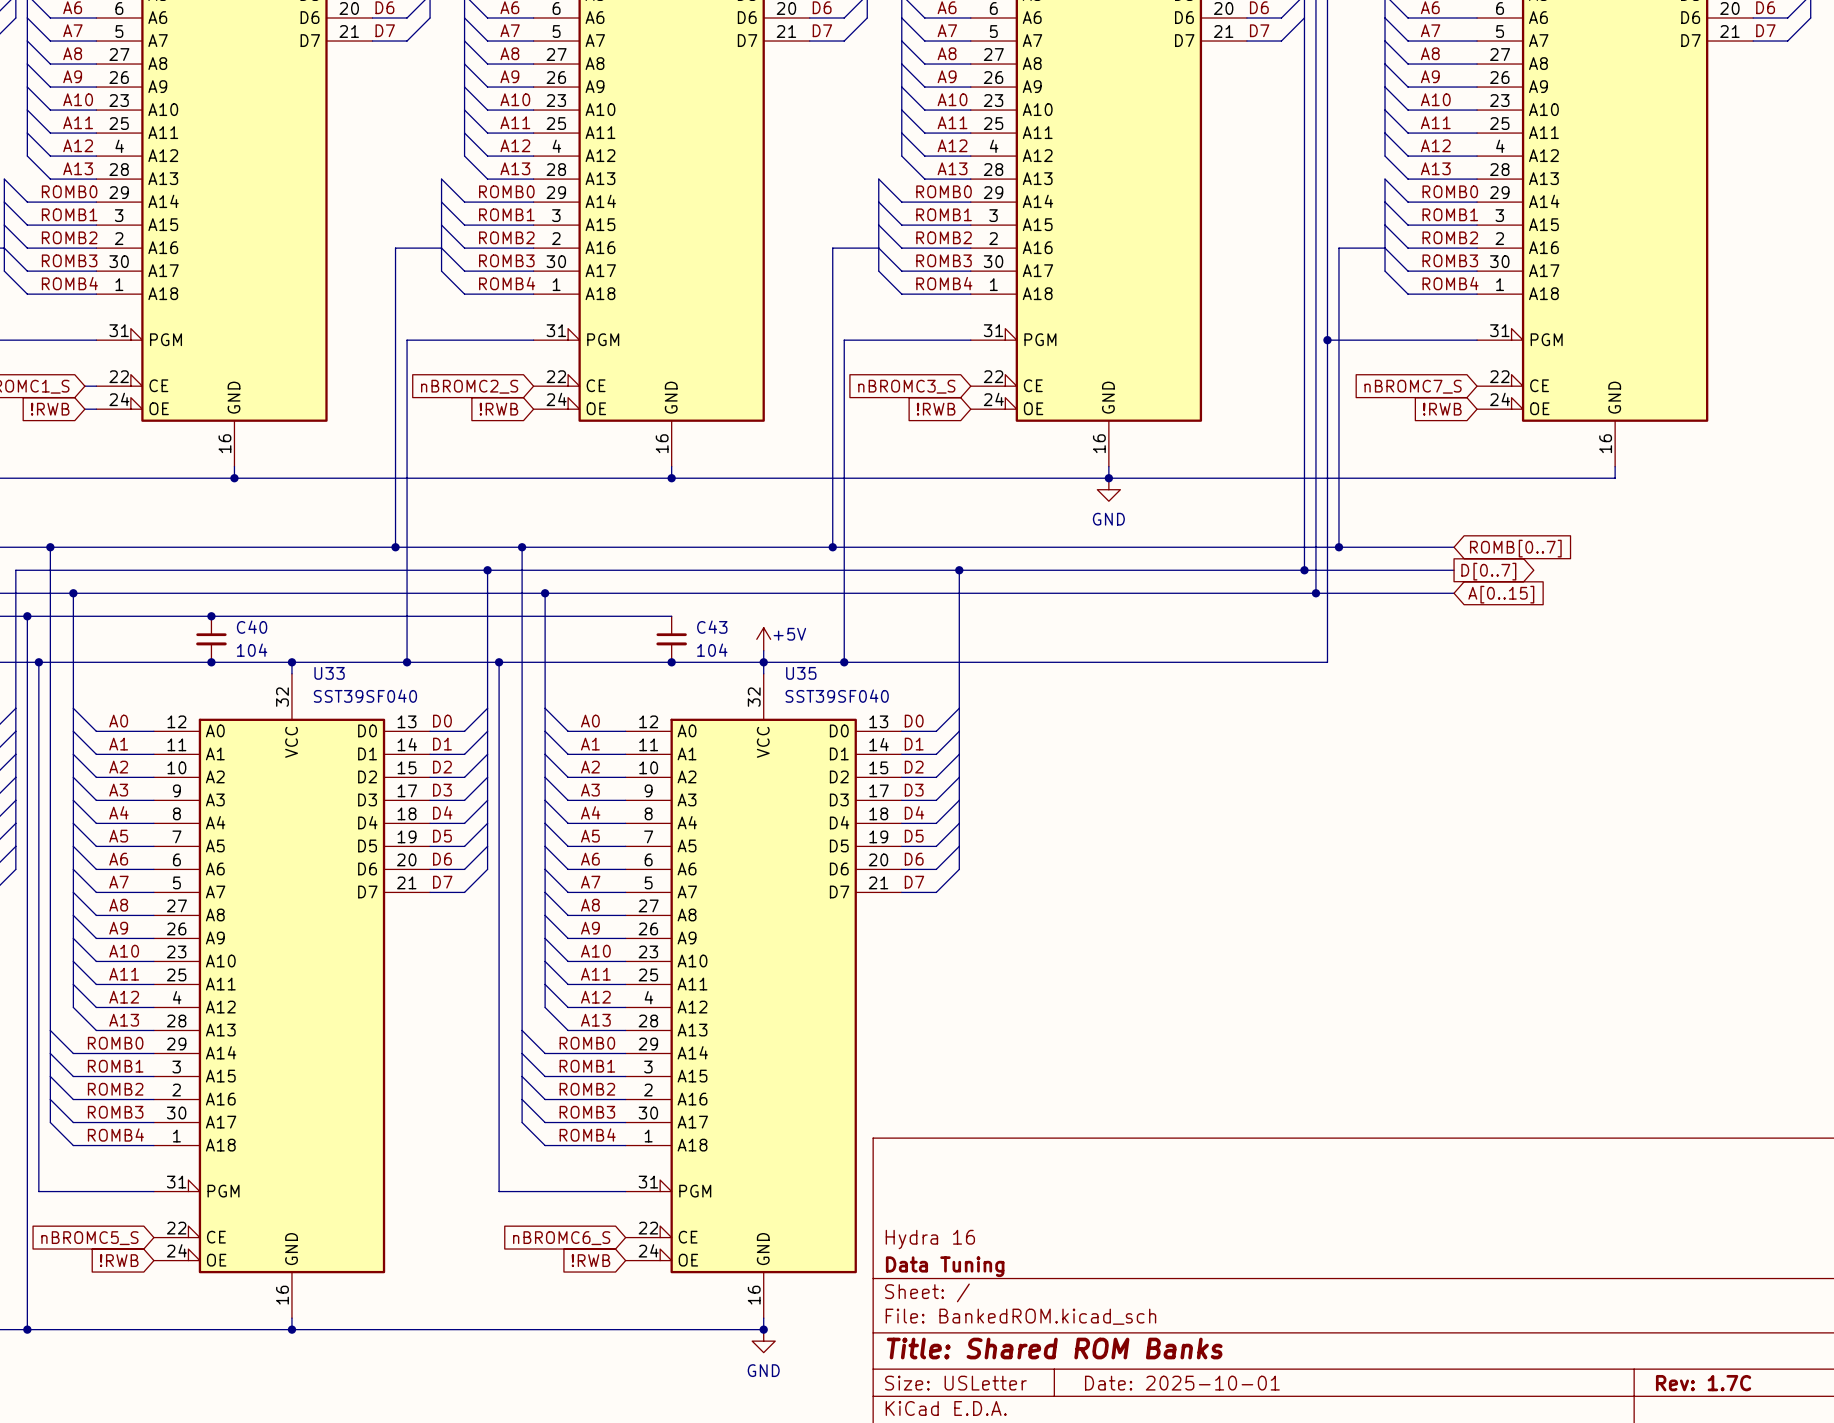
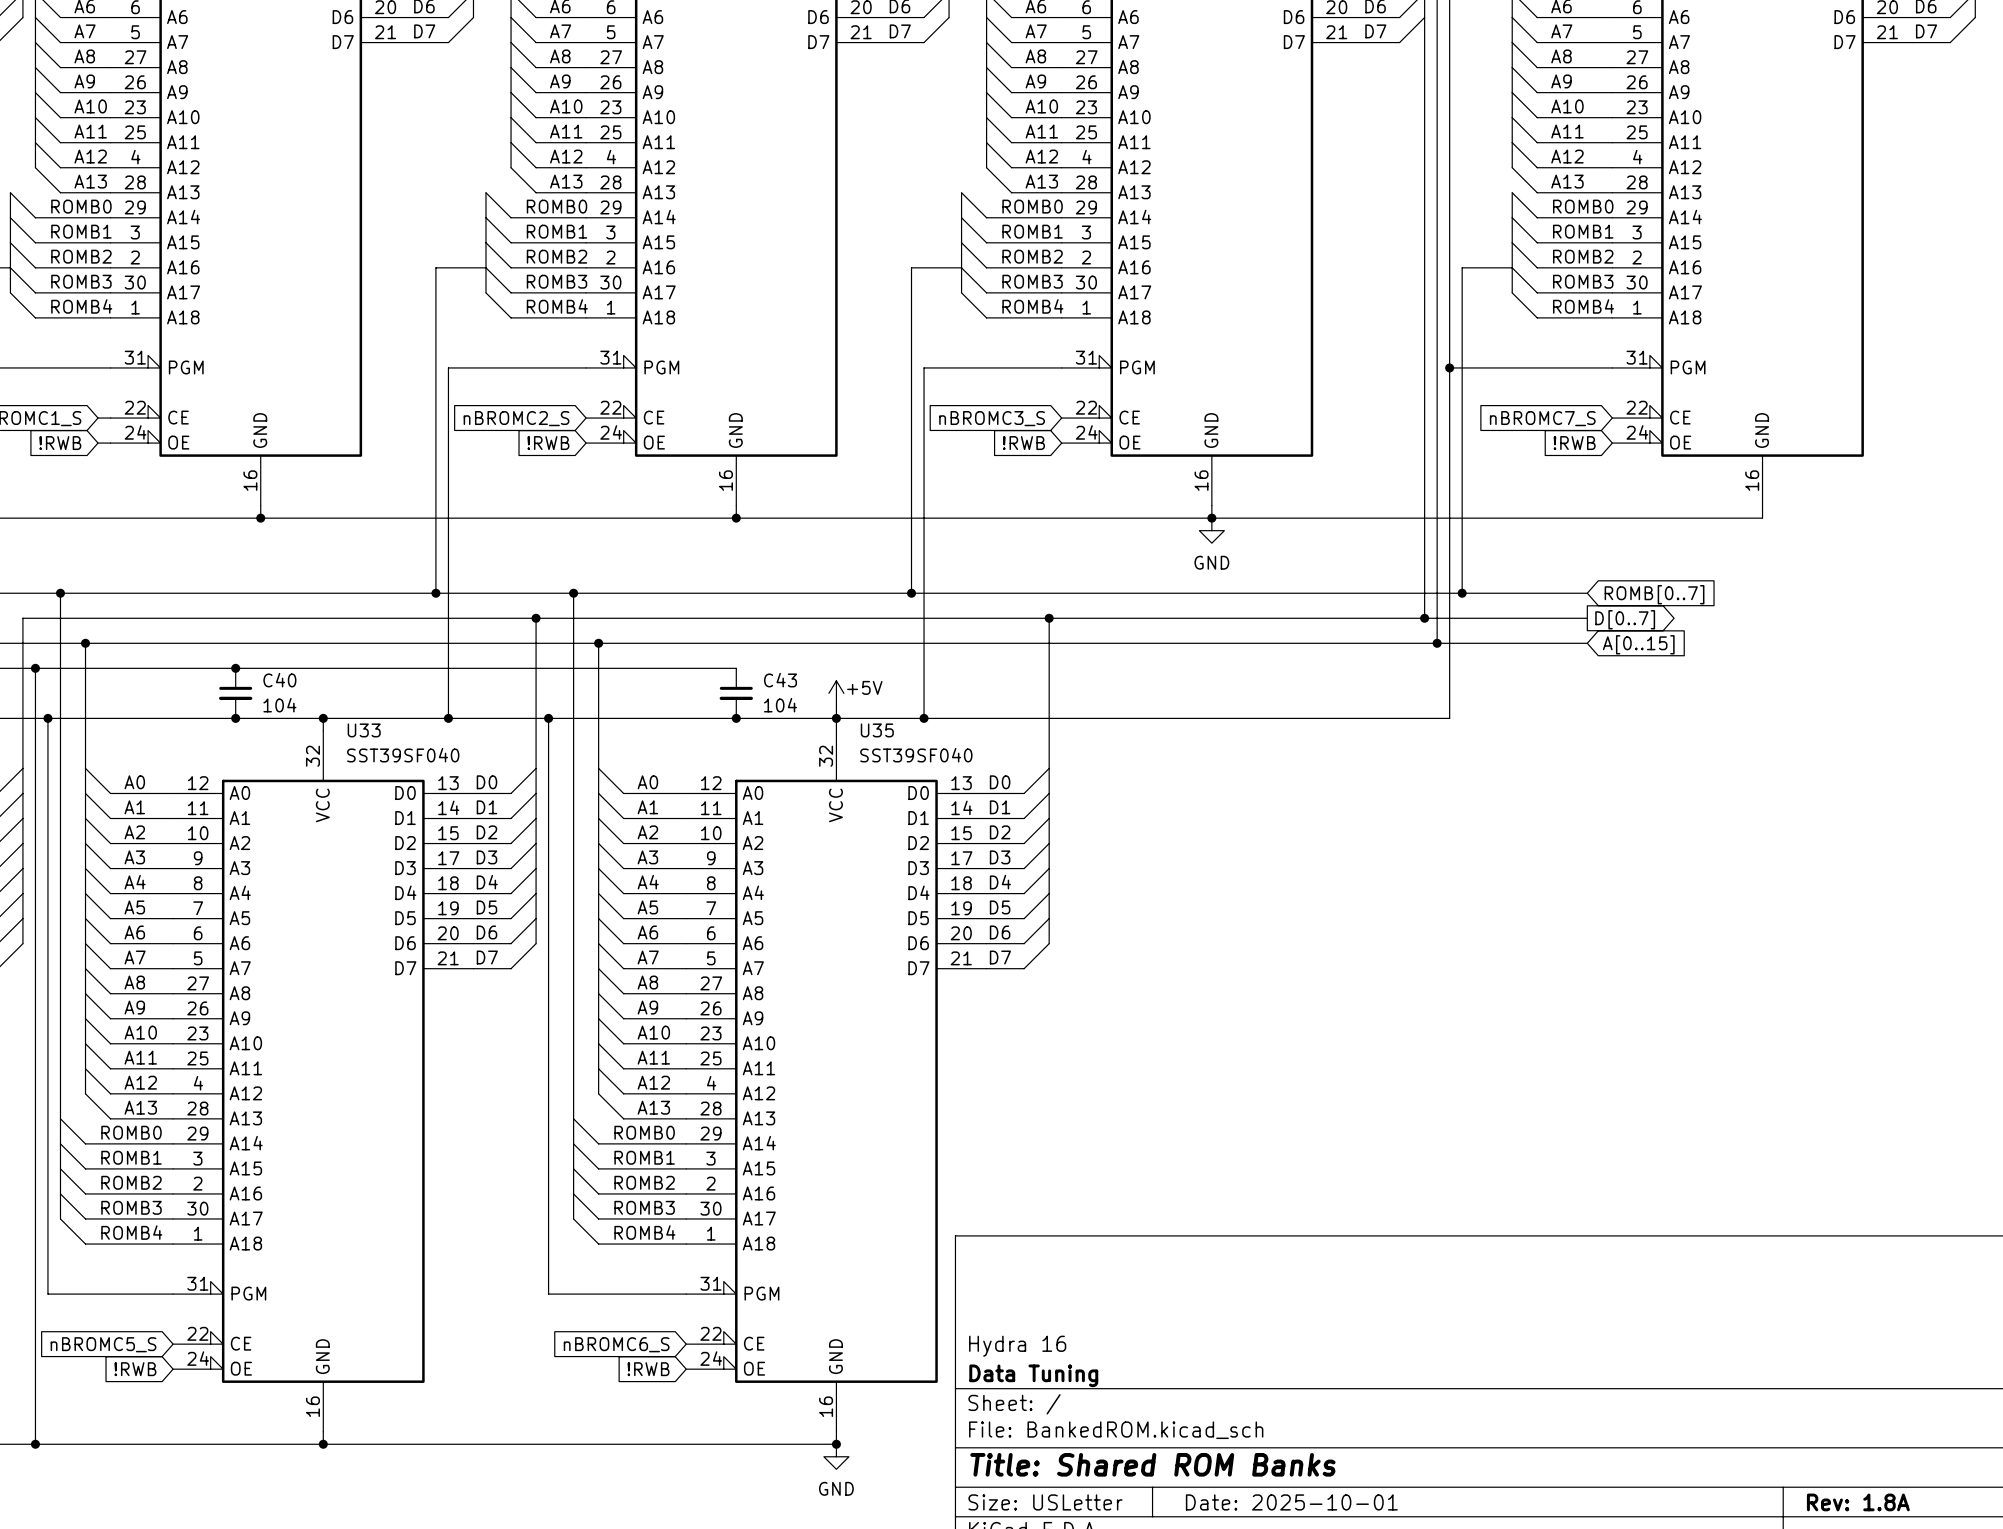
title block: Rev: 1.7C (1703, 1383) -> Rev: 1.8A (1858, 1502)

